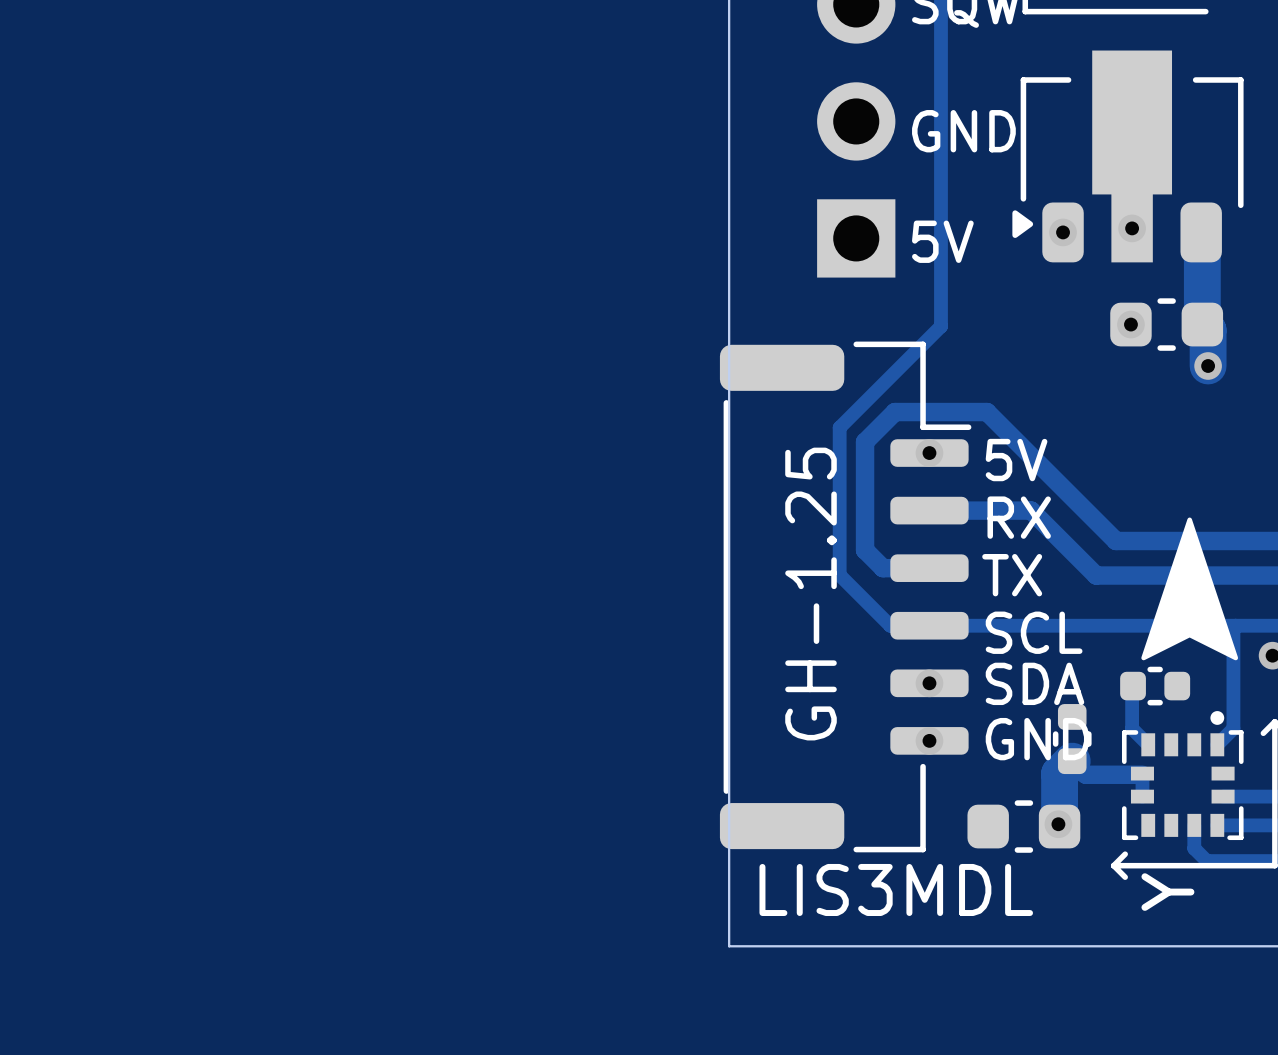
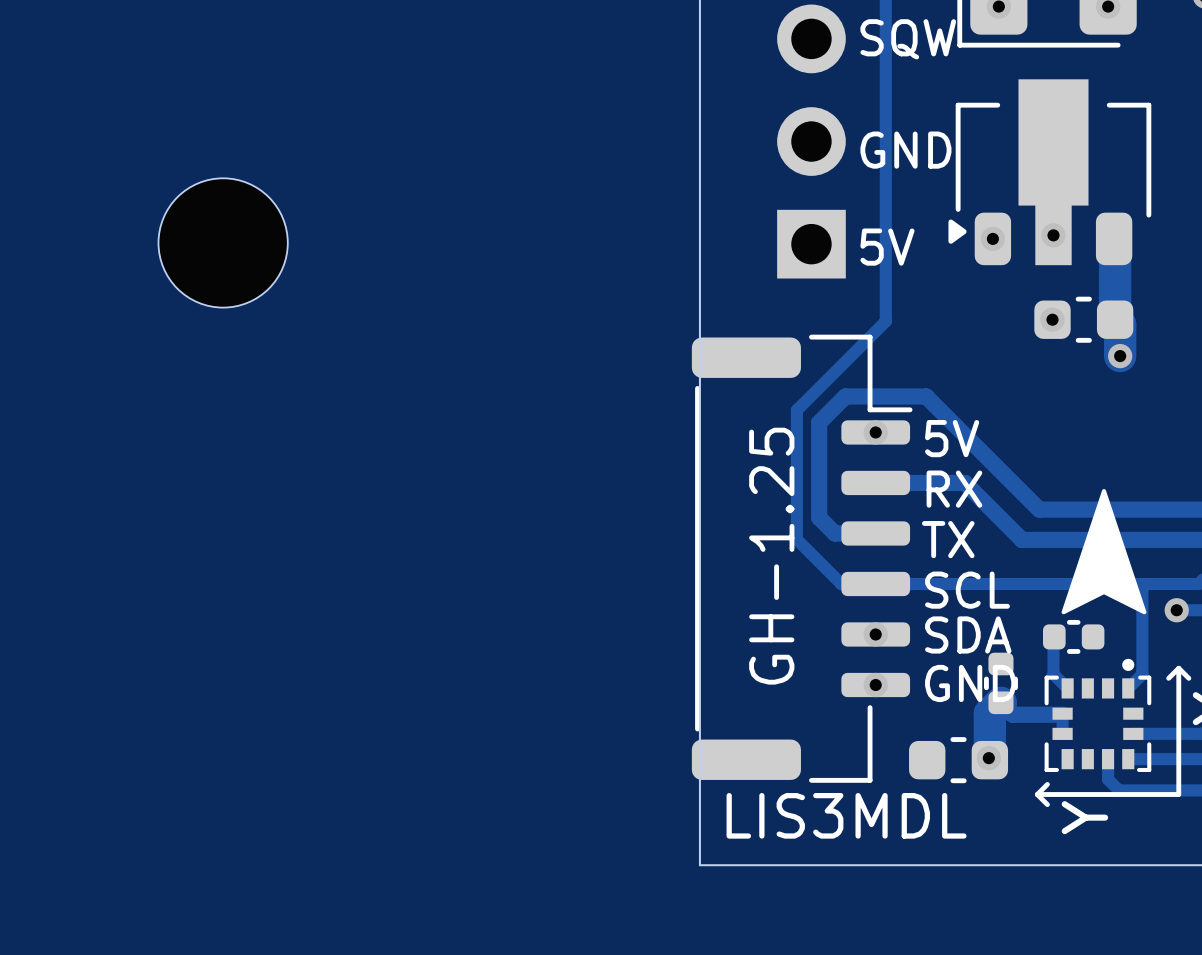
part: none -> (223, 242)

